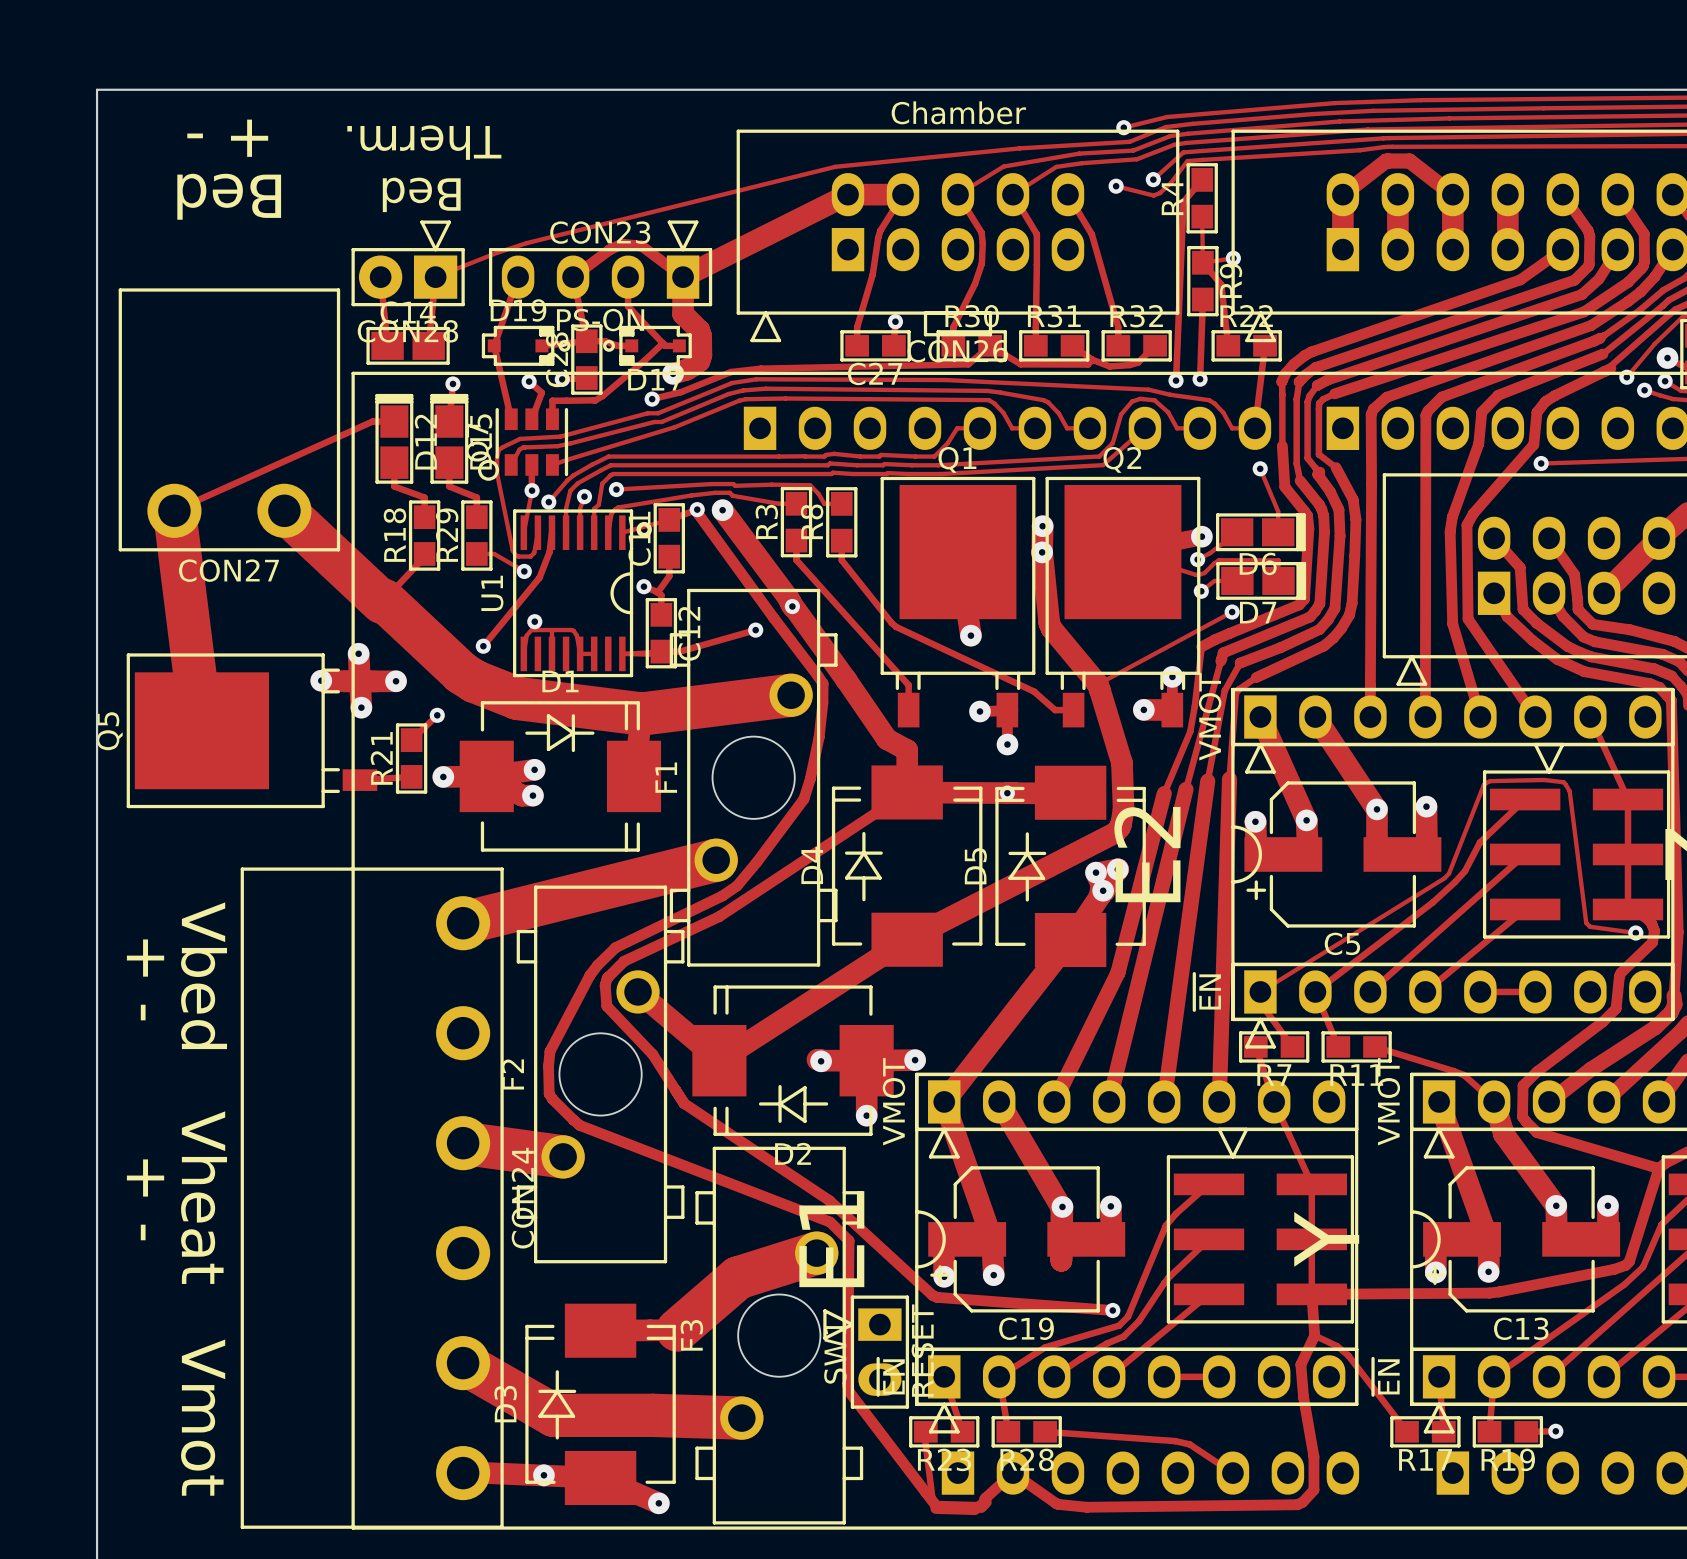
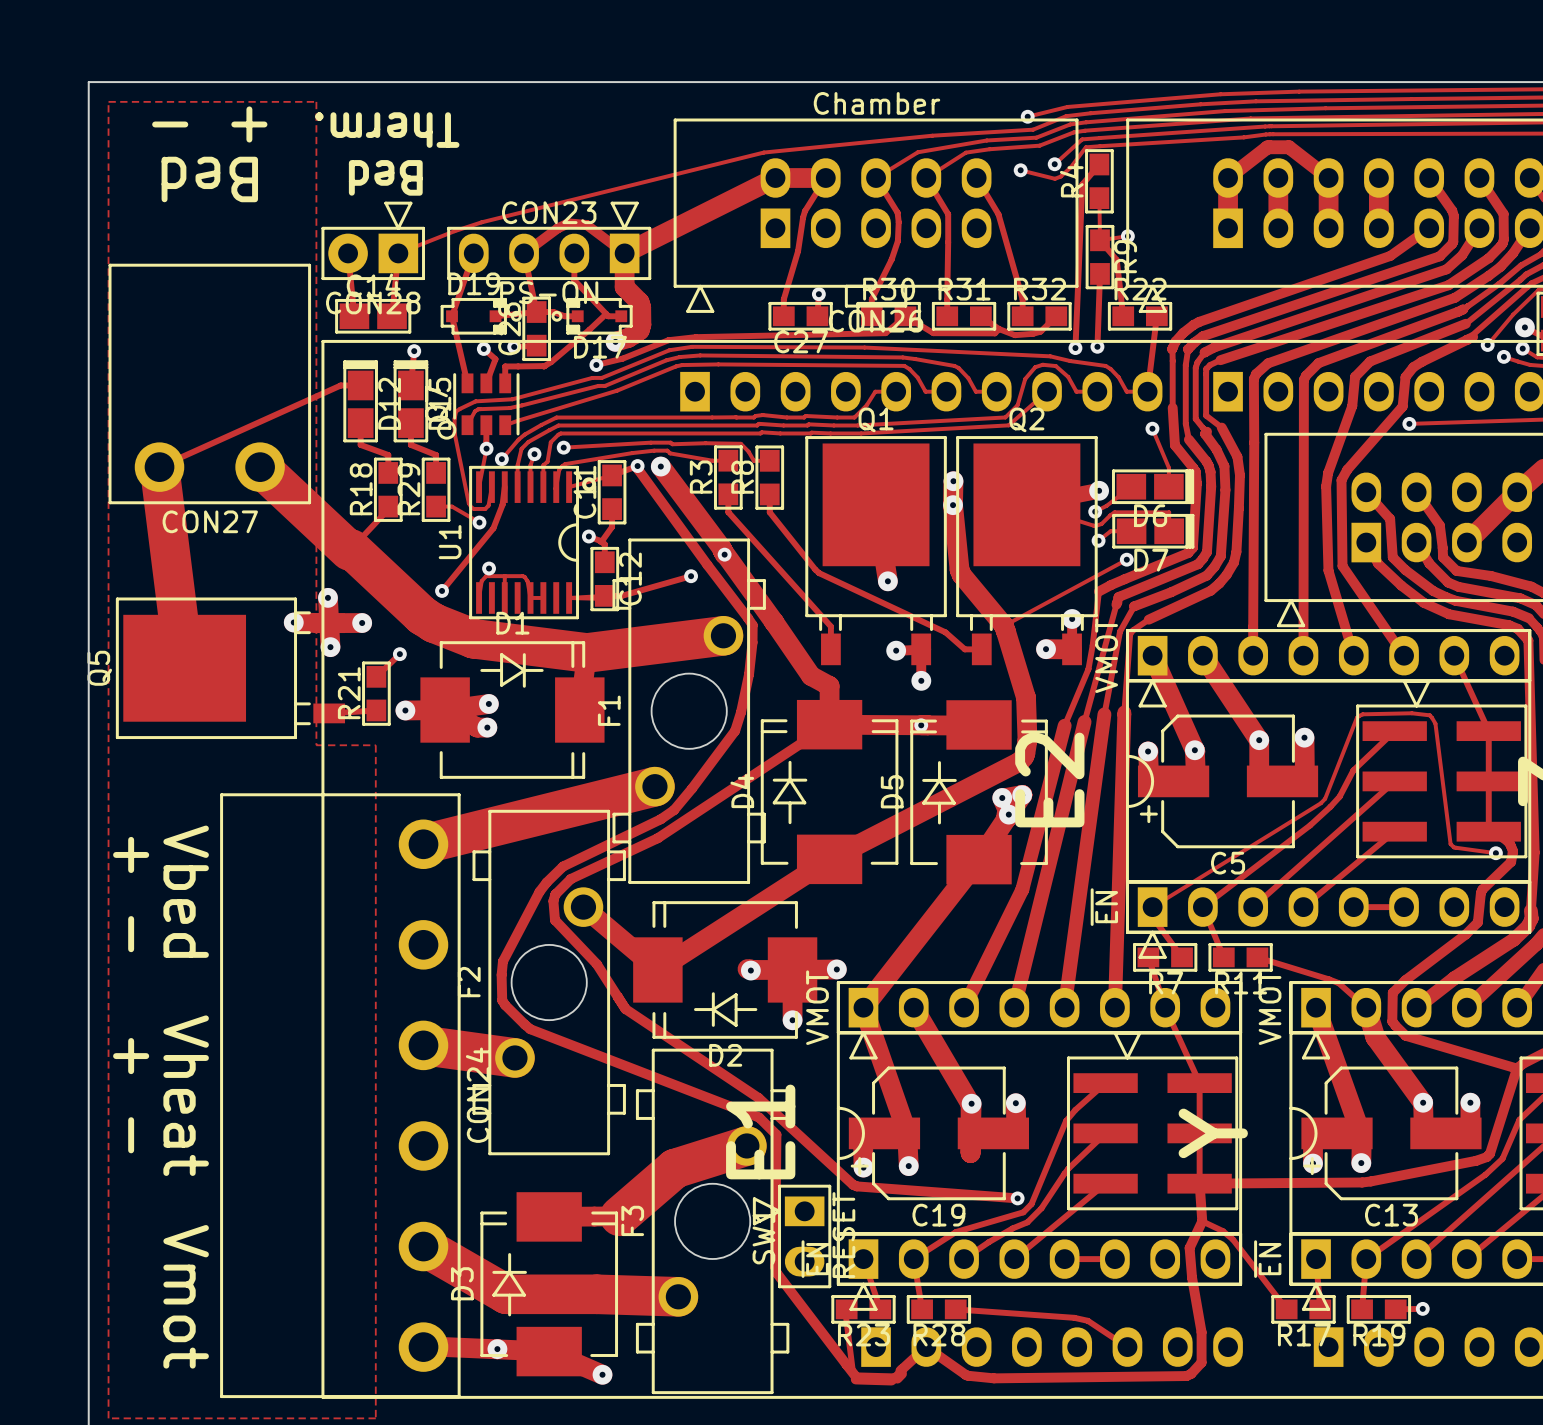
zone outline: none -> (108, 101) (108, 1418) (375, 1418) (375, 745) (316, 745) (316, 101) (108, 101)

